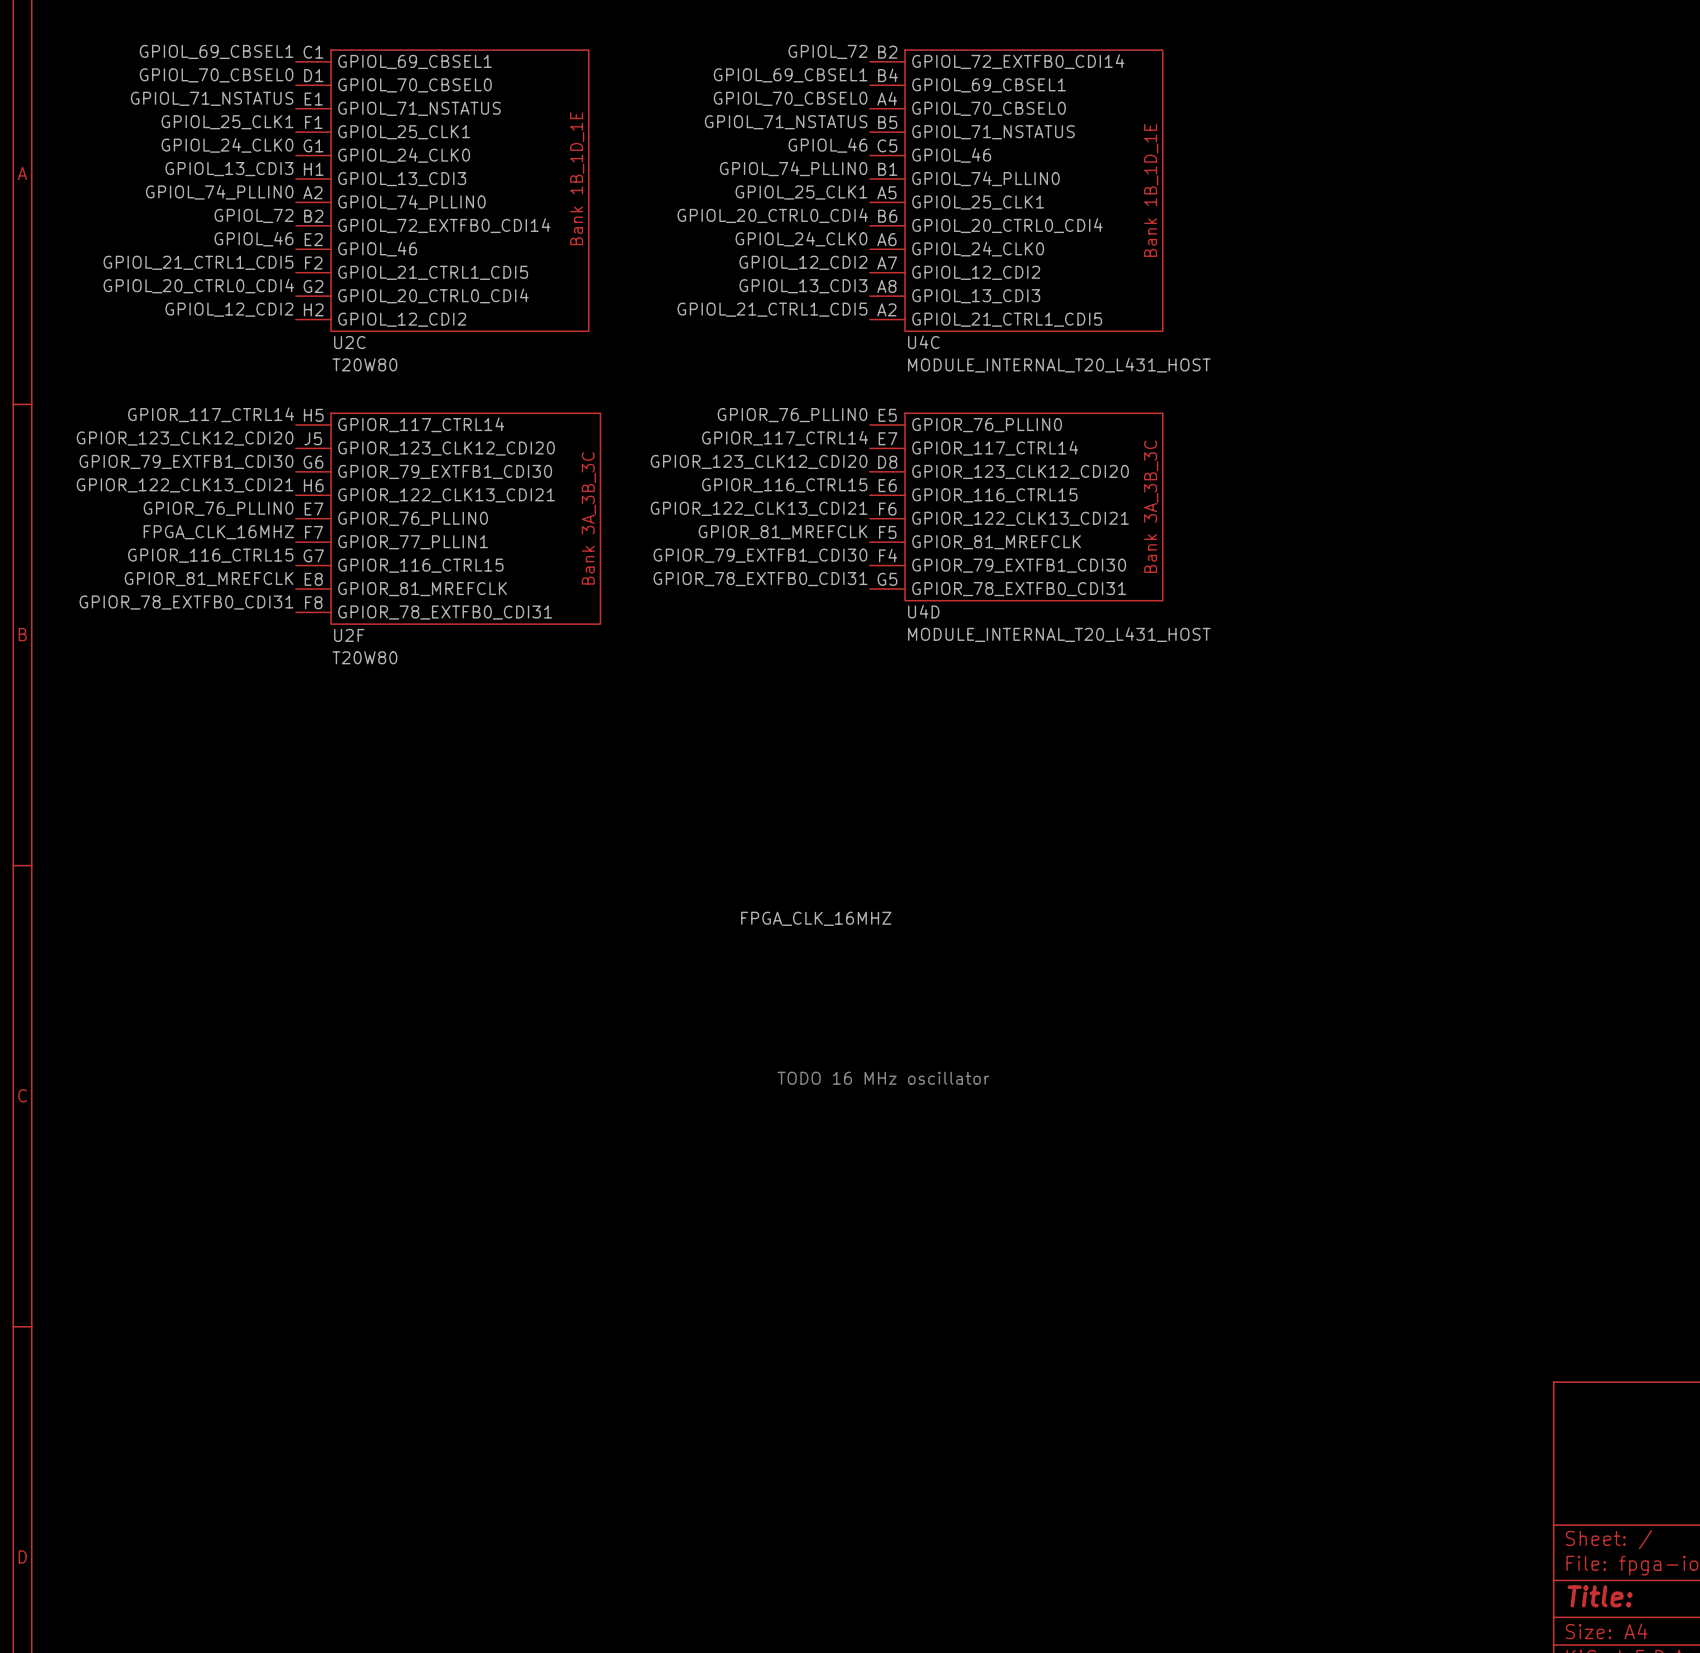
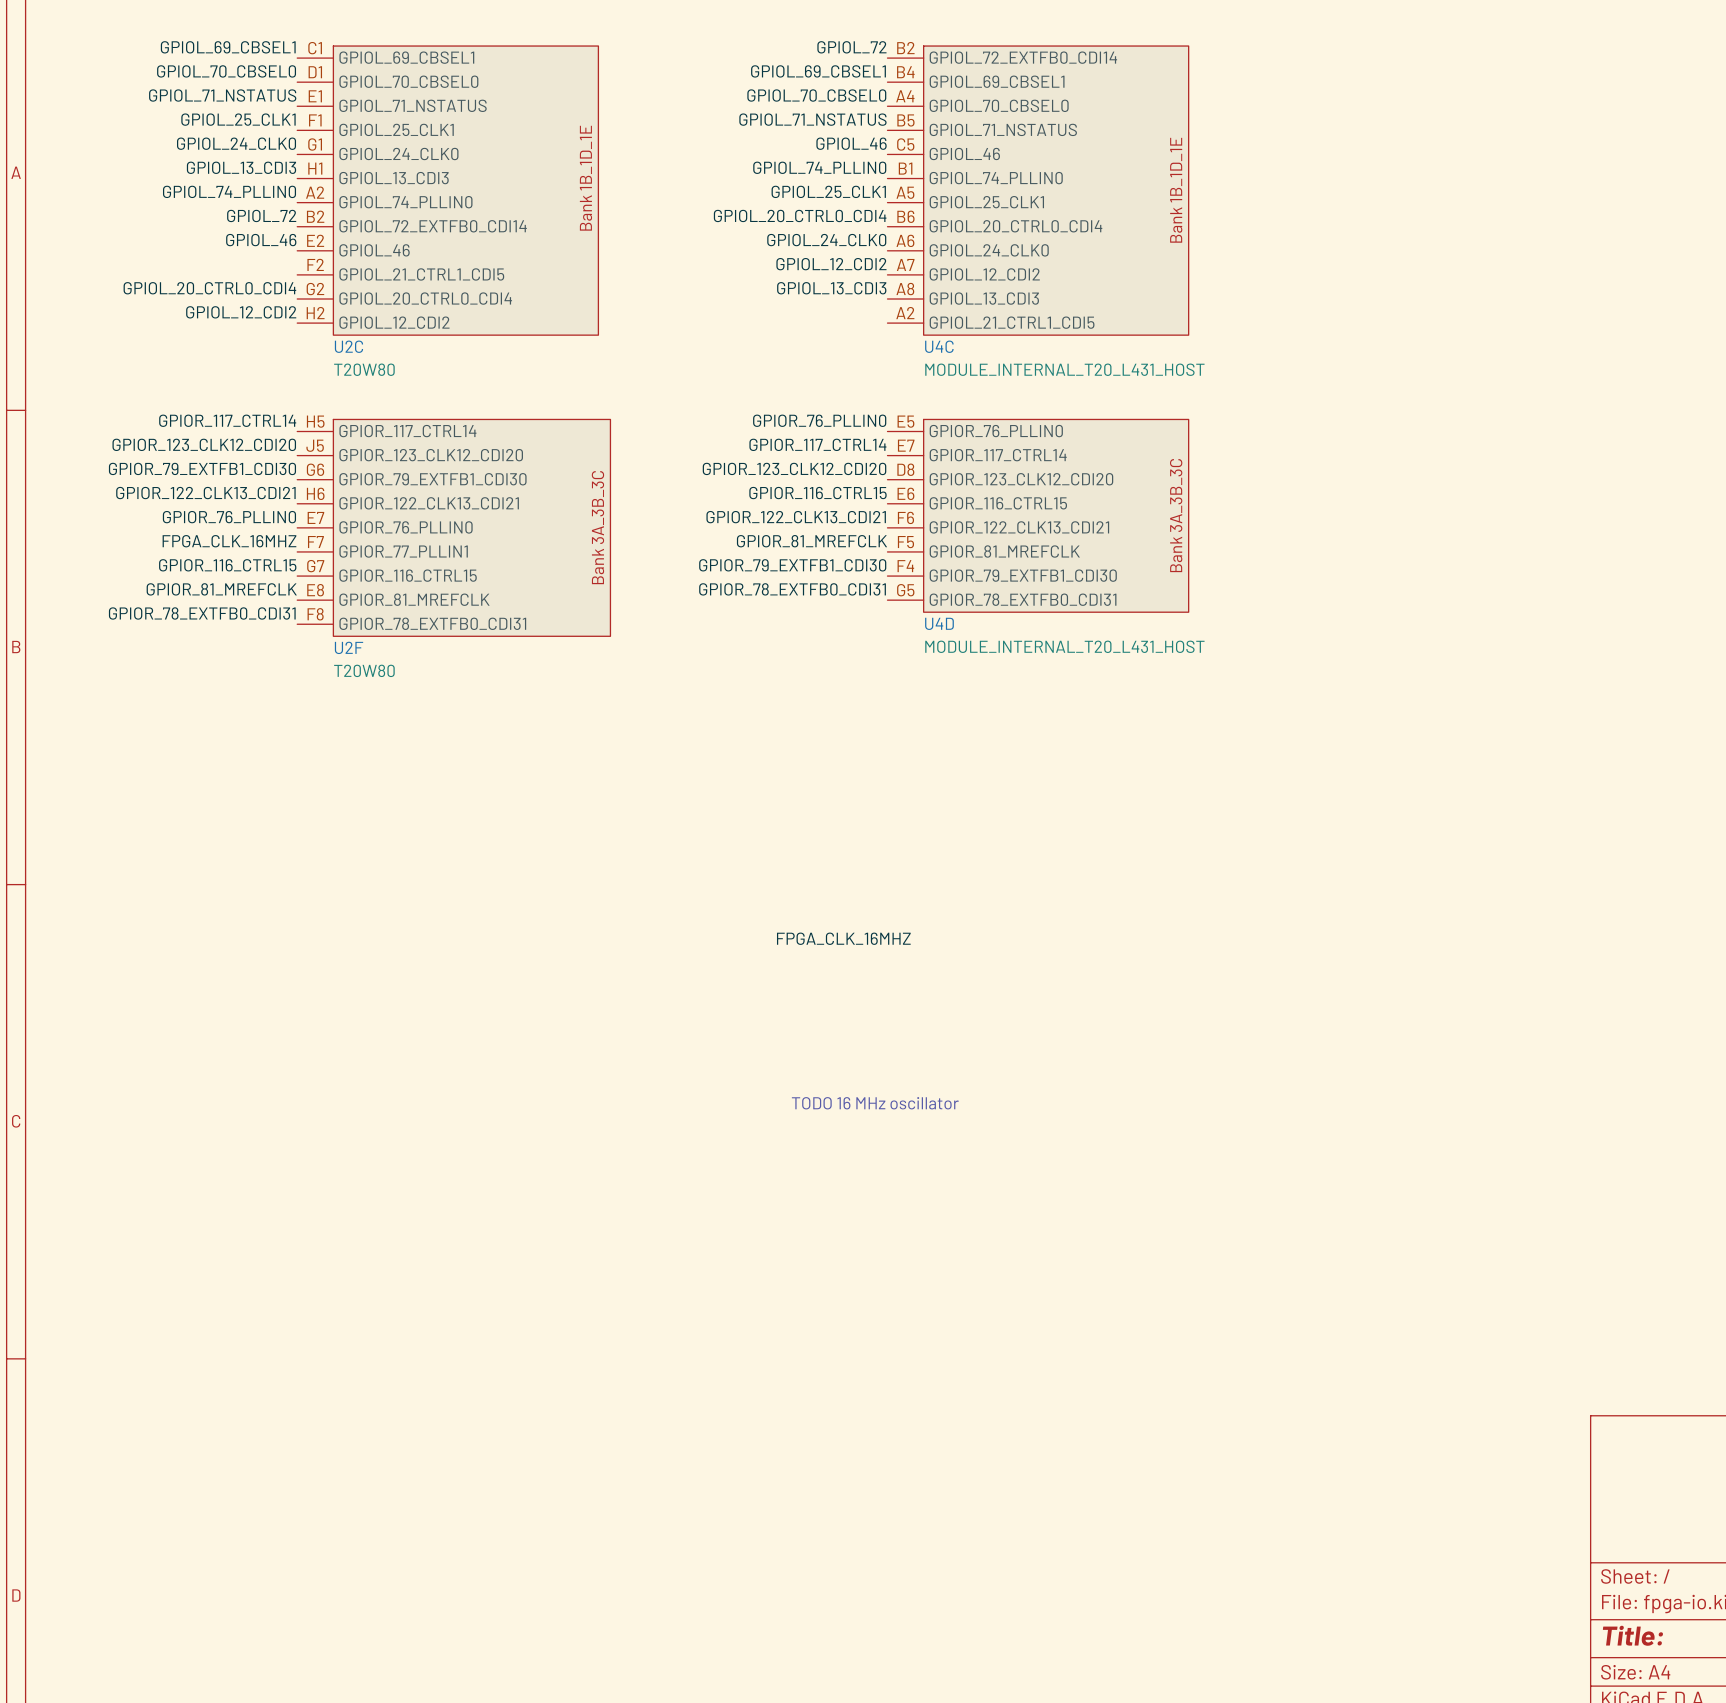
label: GPIOL_21_CTRL1_CDI5 (198, 262) -> none
label: GPIOL_21_CTRL1_CDI5 (772, 309) -> none

